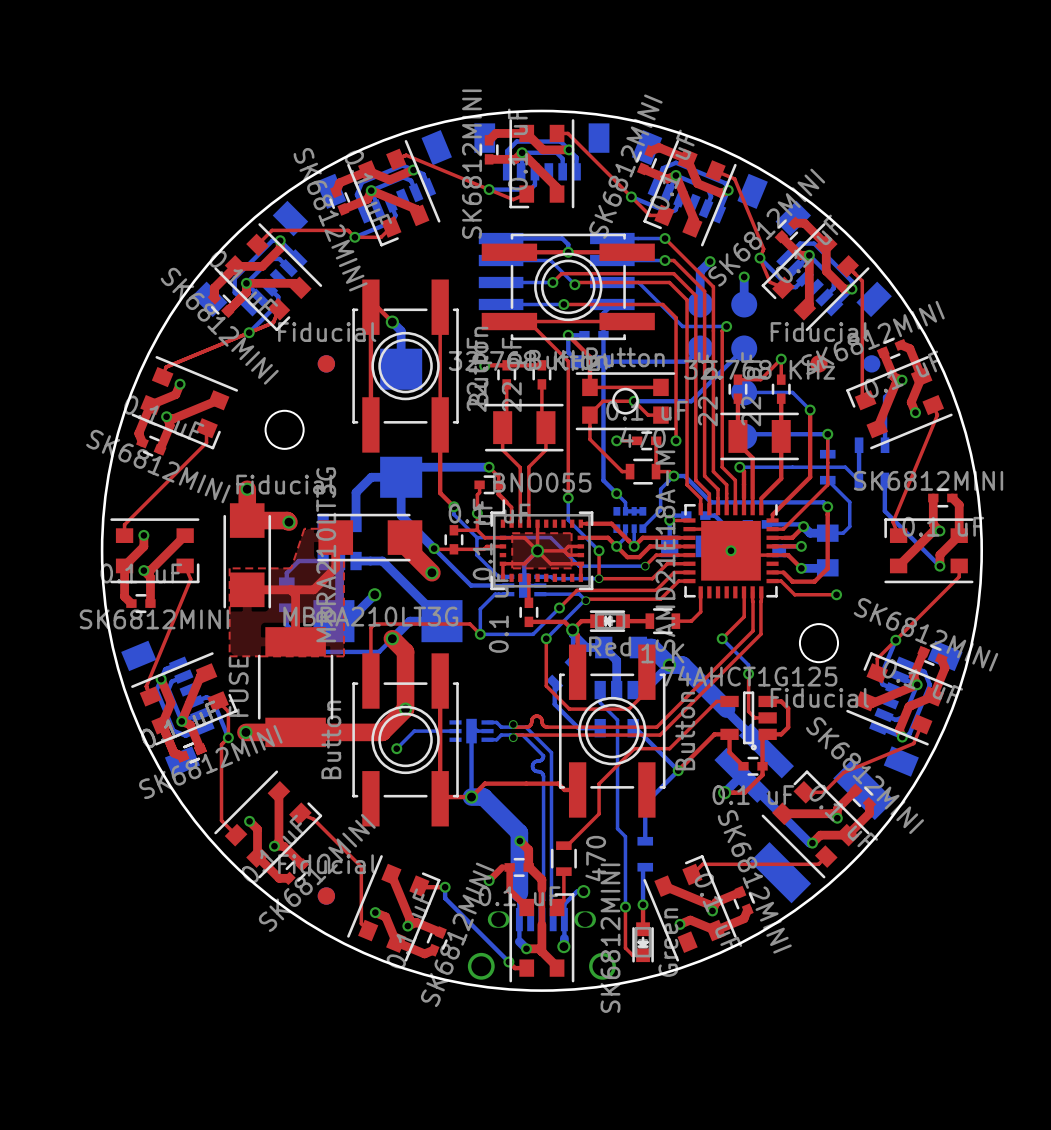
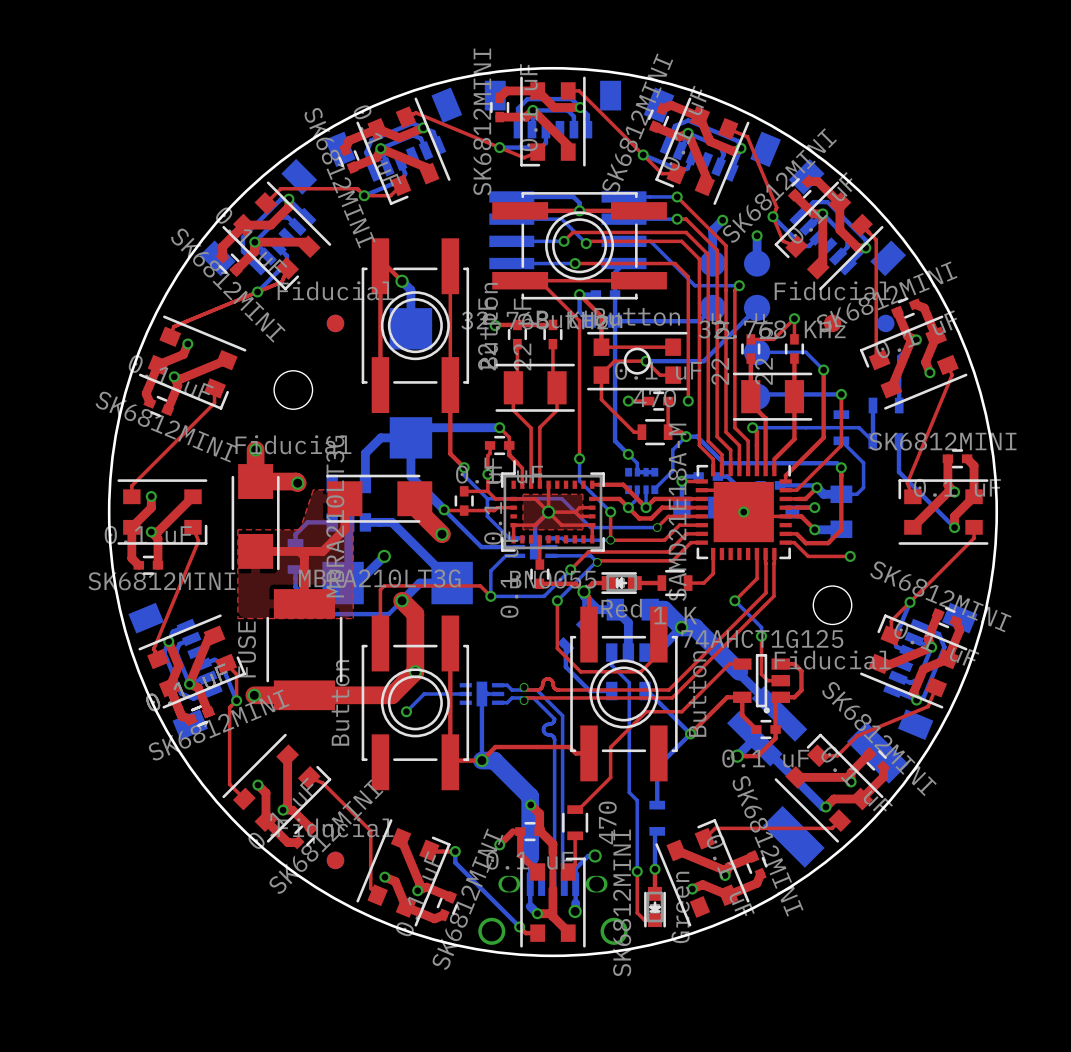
part value position: BNO055 (542, 482) -> BNO055 (553, 579)

